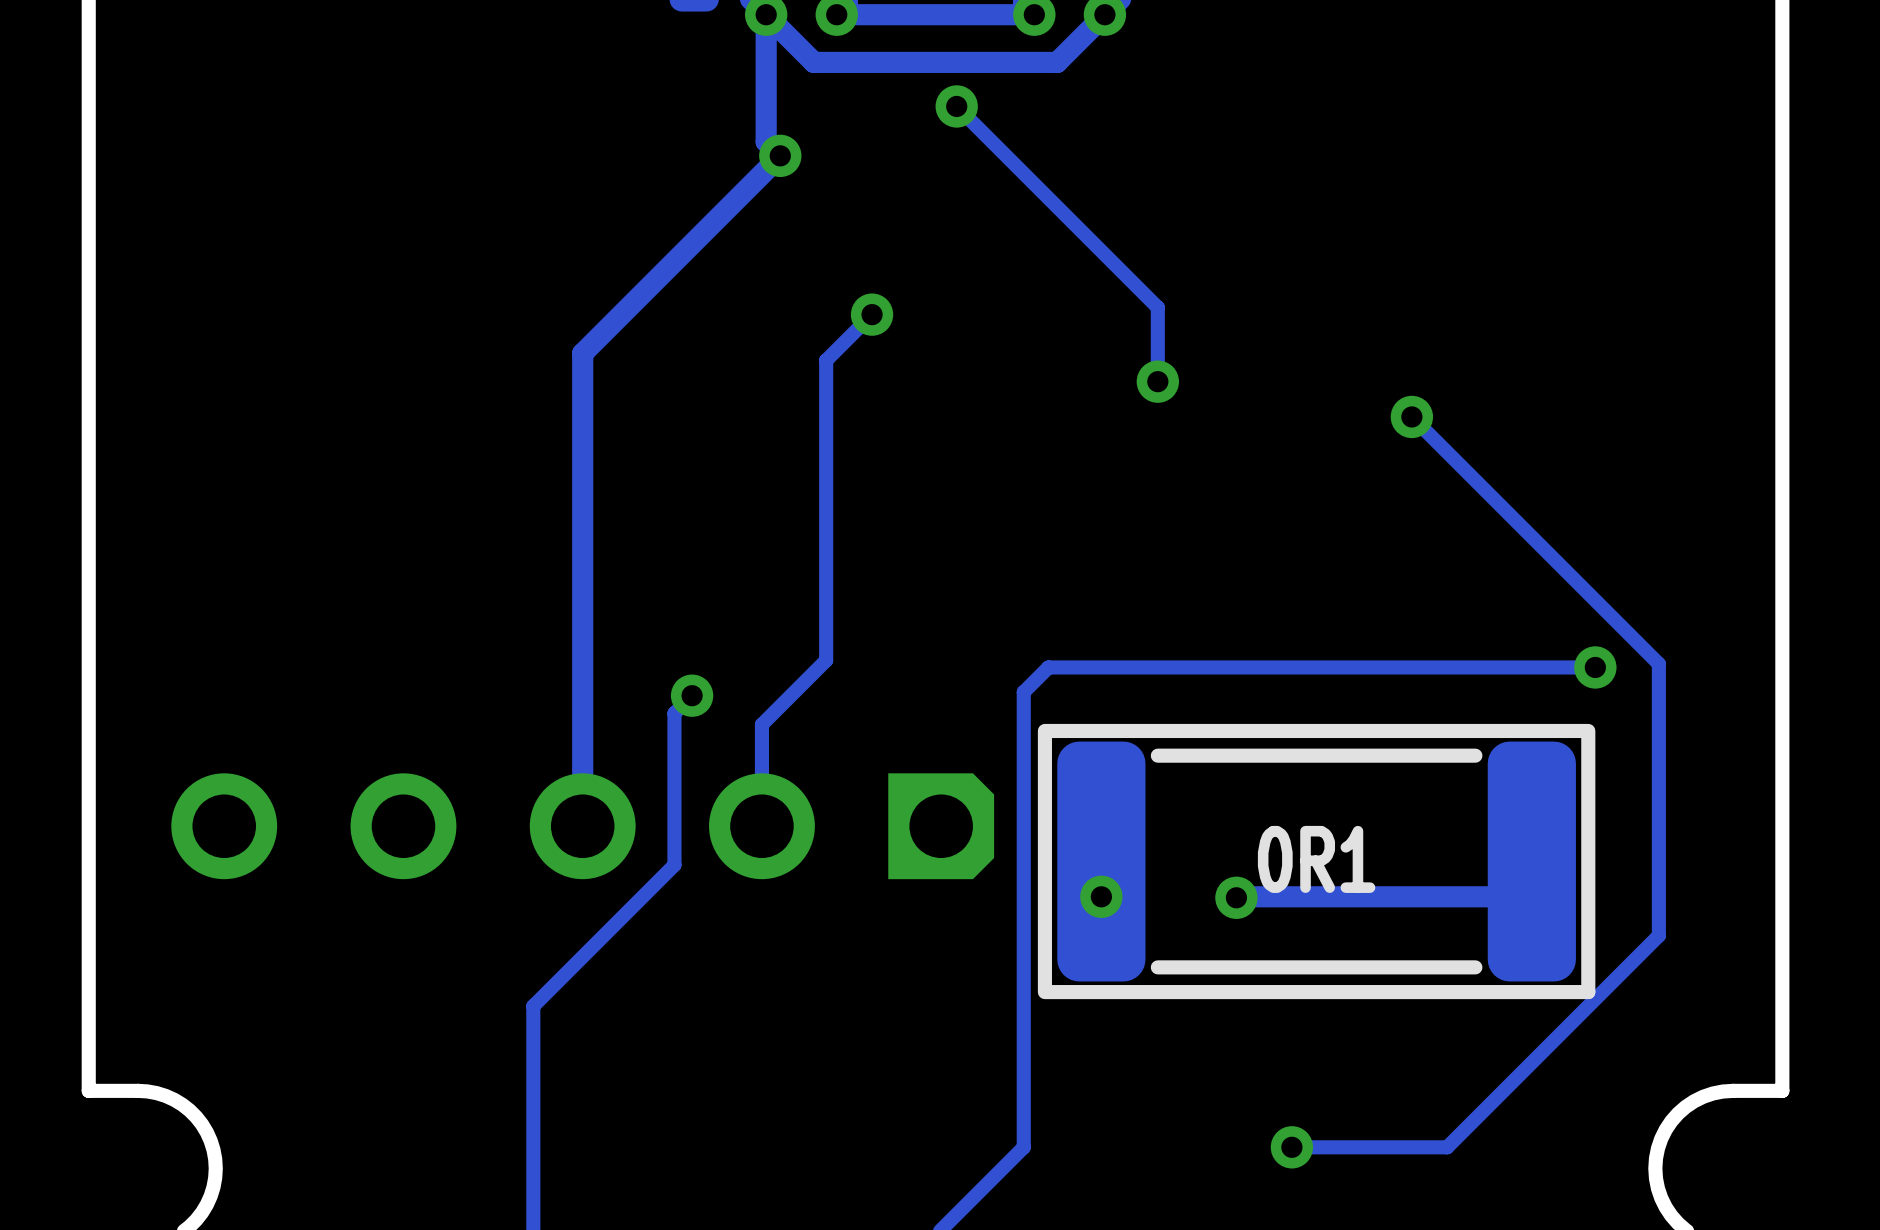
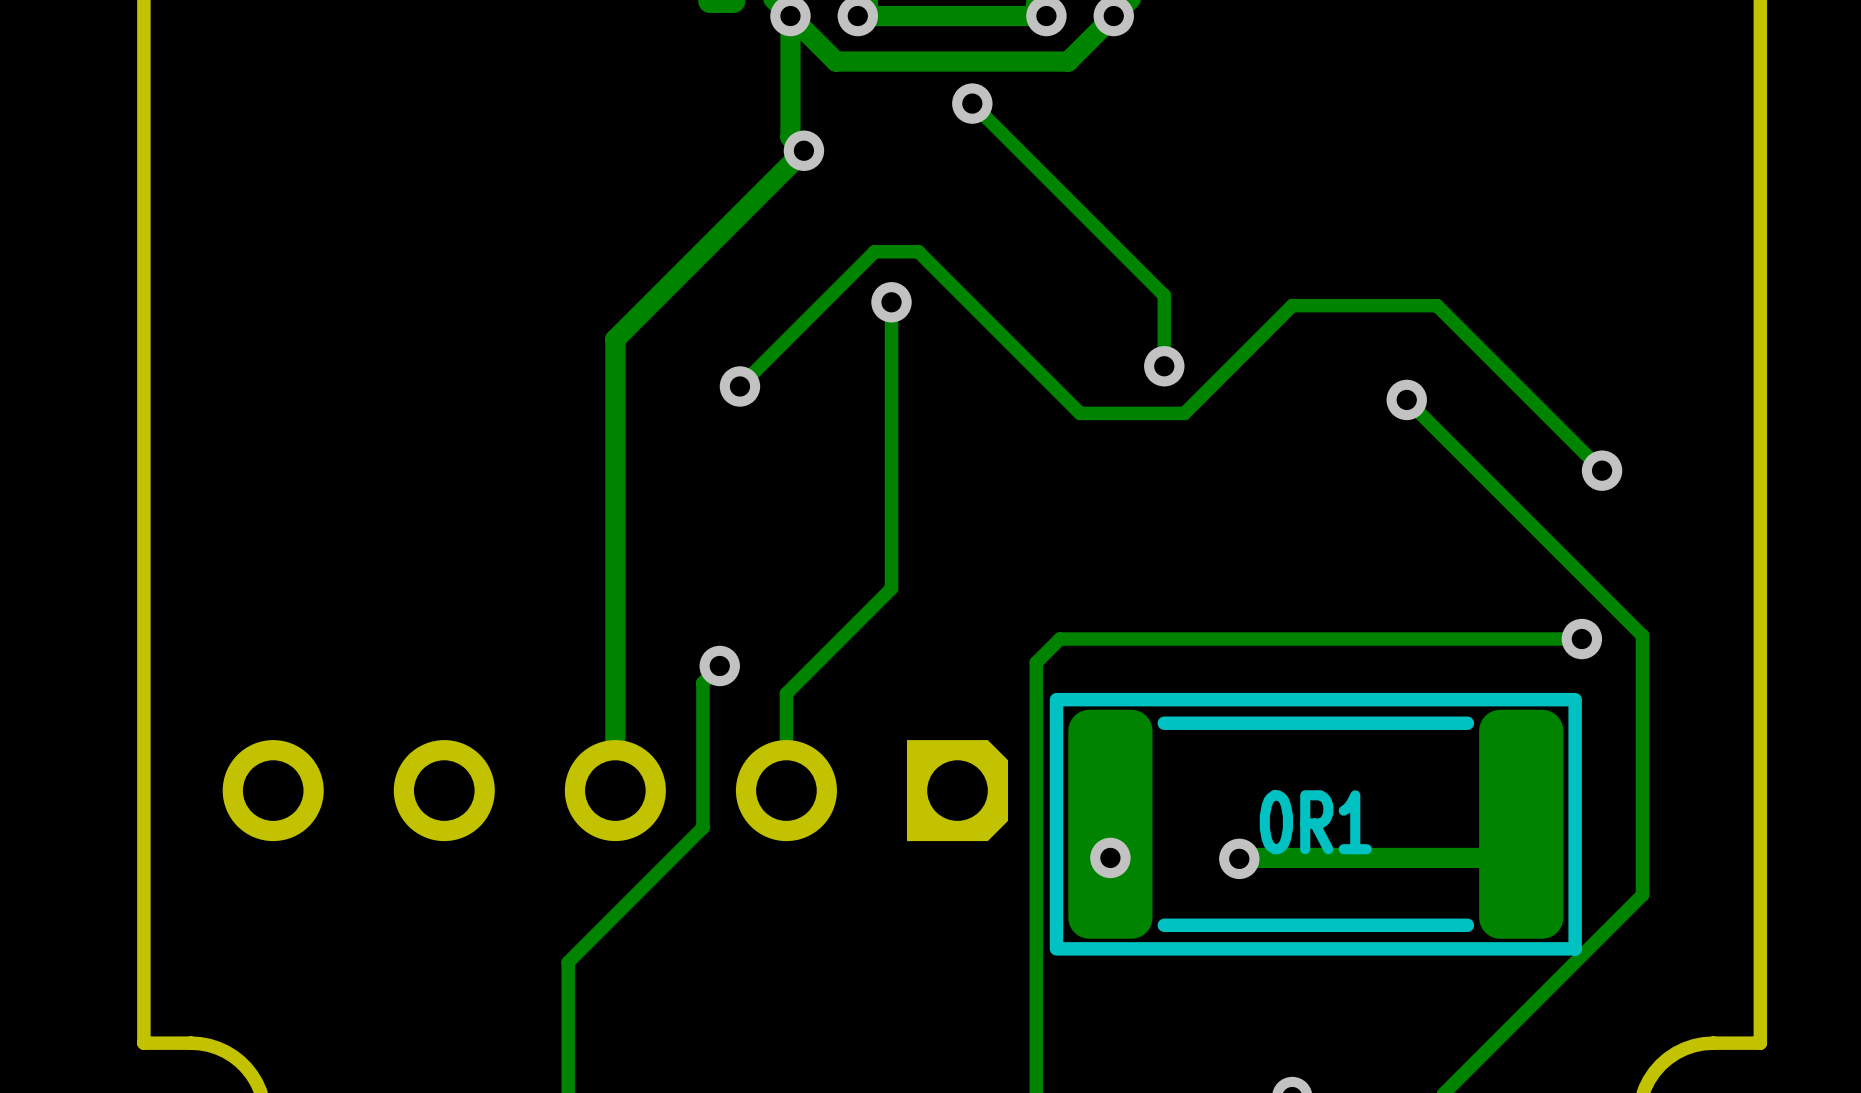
track: (872, 314) (826, 360) (826, 660) -> (891, 302) (891, 588) (847, 632)
track: none -> (739, 386) (874, 251) (918, 251) (1080, 413) (1184, 413) (1292, 305) (1437, 305) (1602, 470)
via: none -> (739, 386)
via: none -> (1602, 470)

